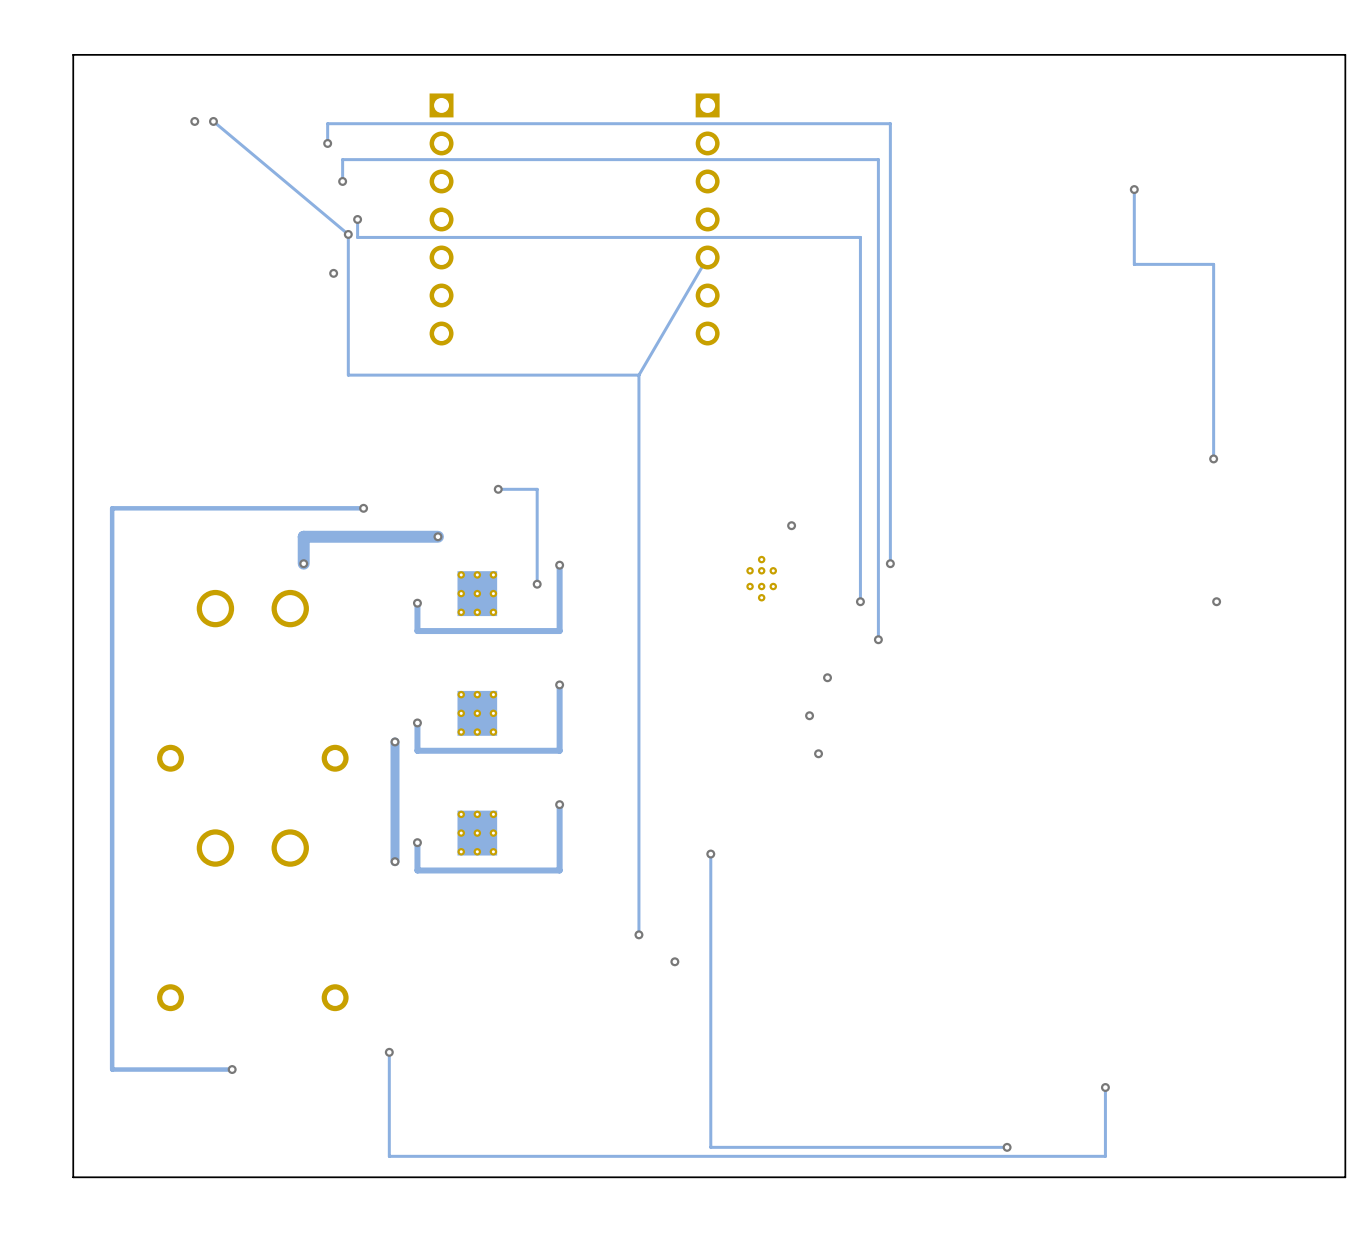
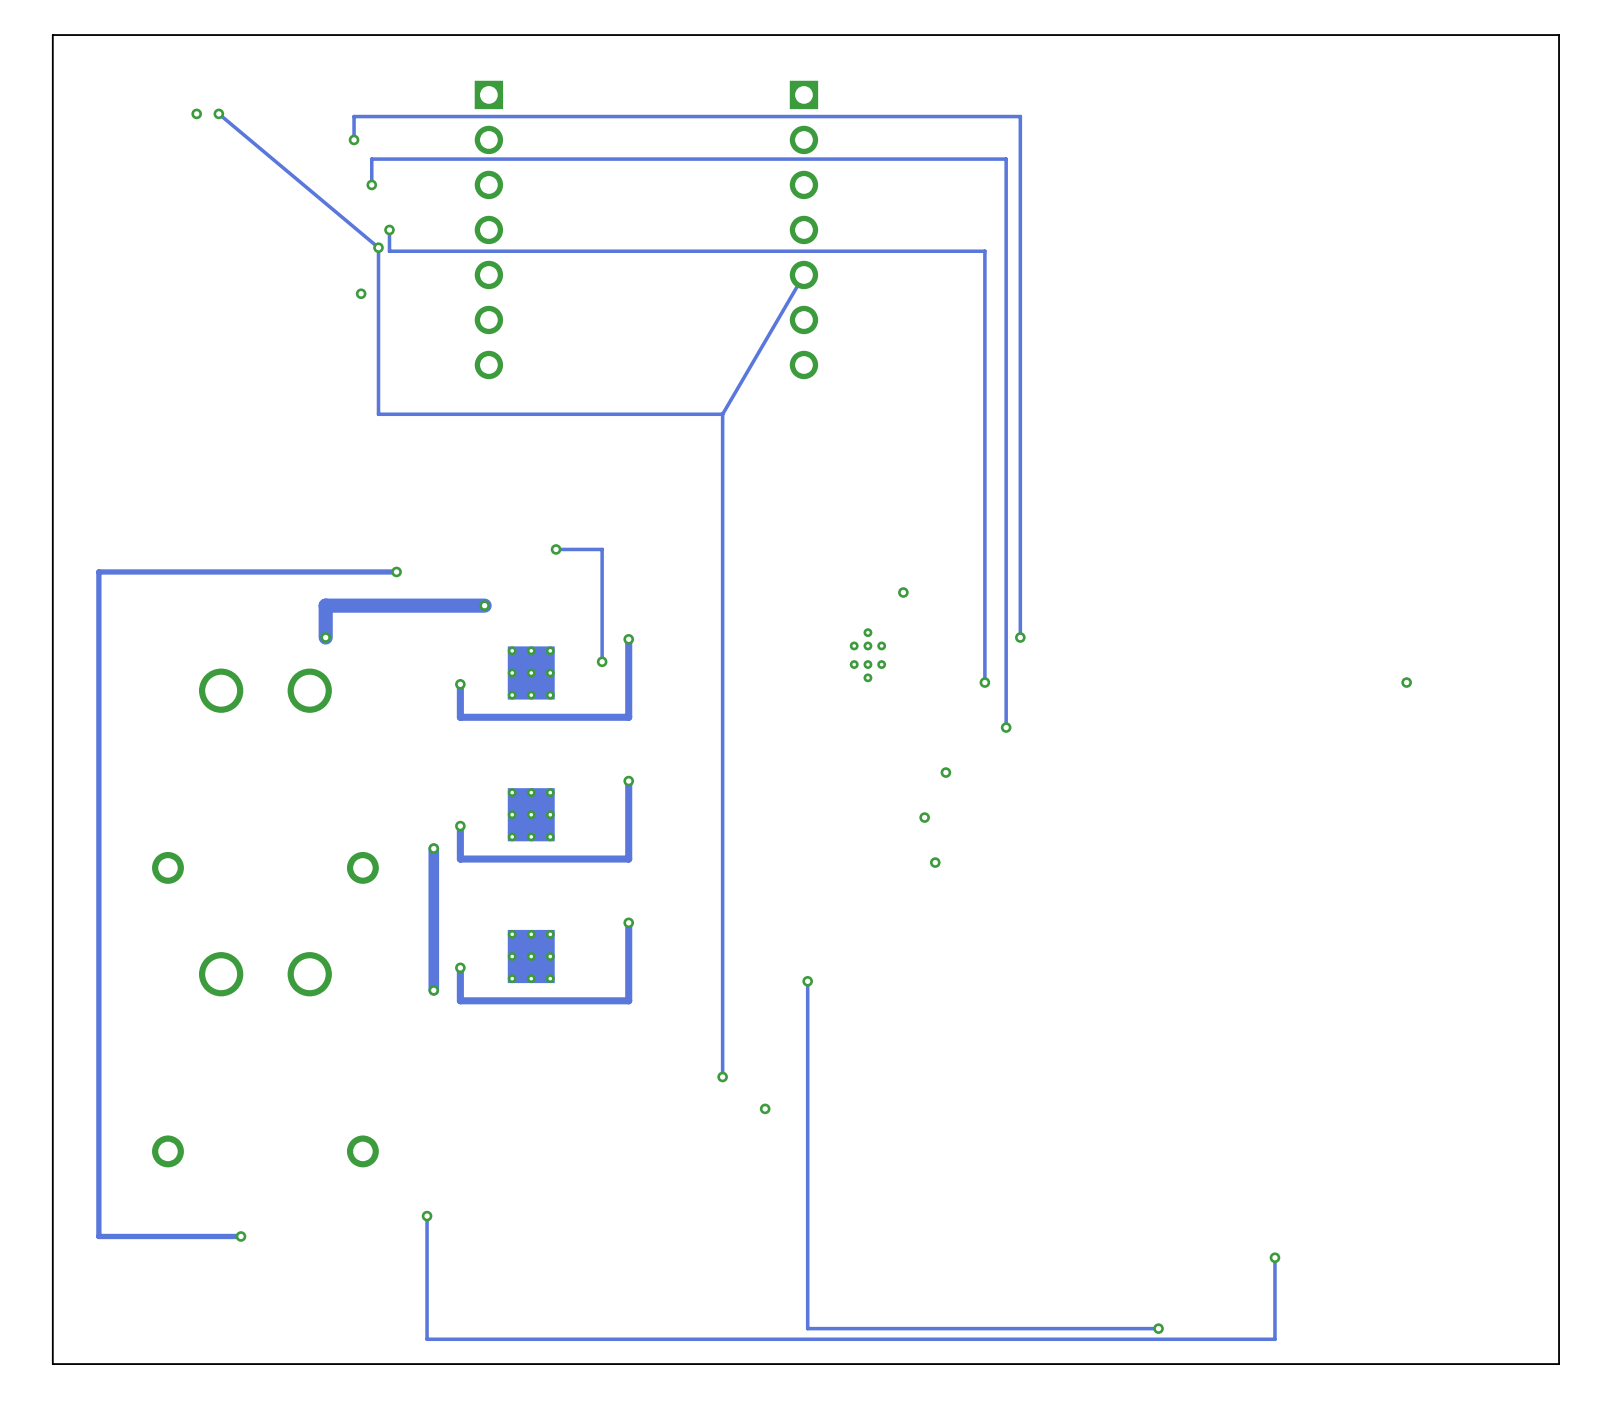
track: (1134, 189) (1134, 264) (1213, 264) (1213, 458) -> none
via: (1134, 189) -> none
via: (1213, 458) -> none

